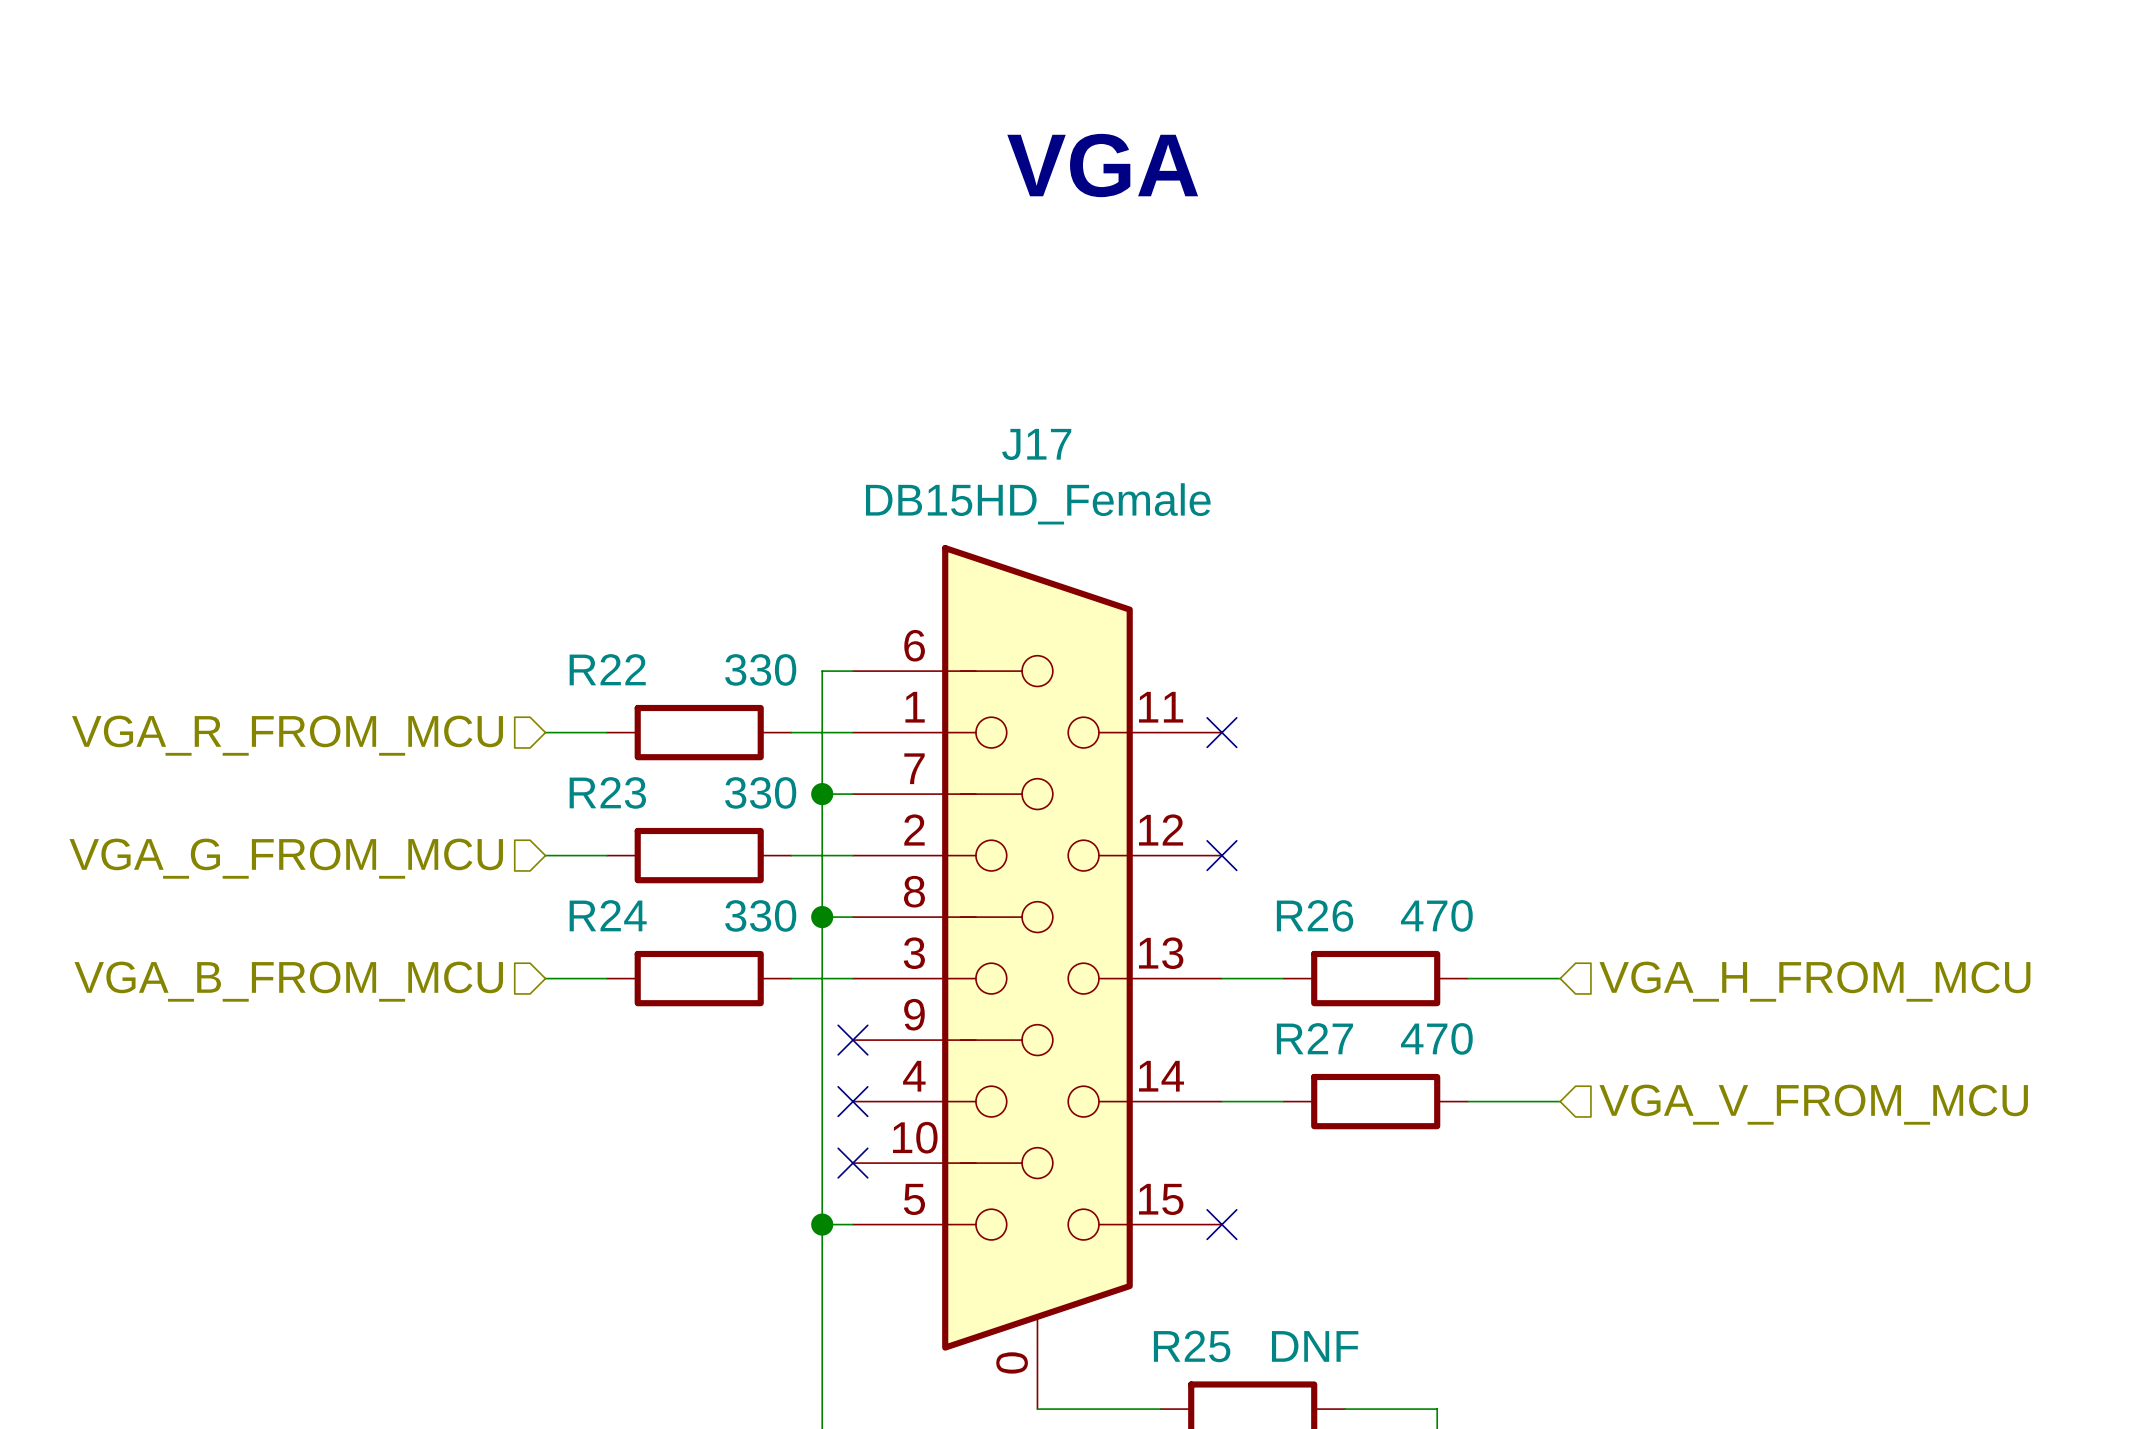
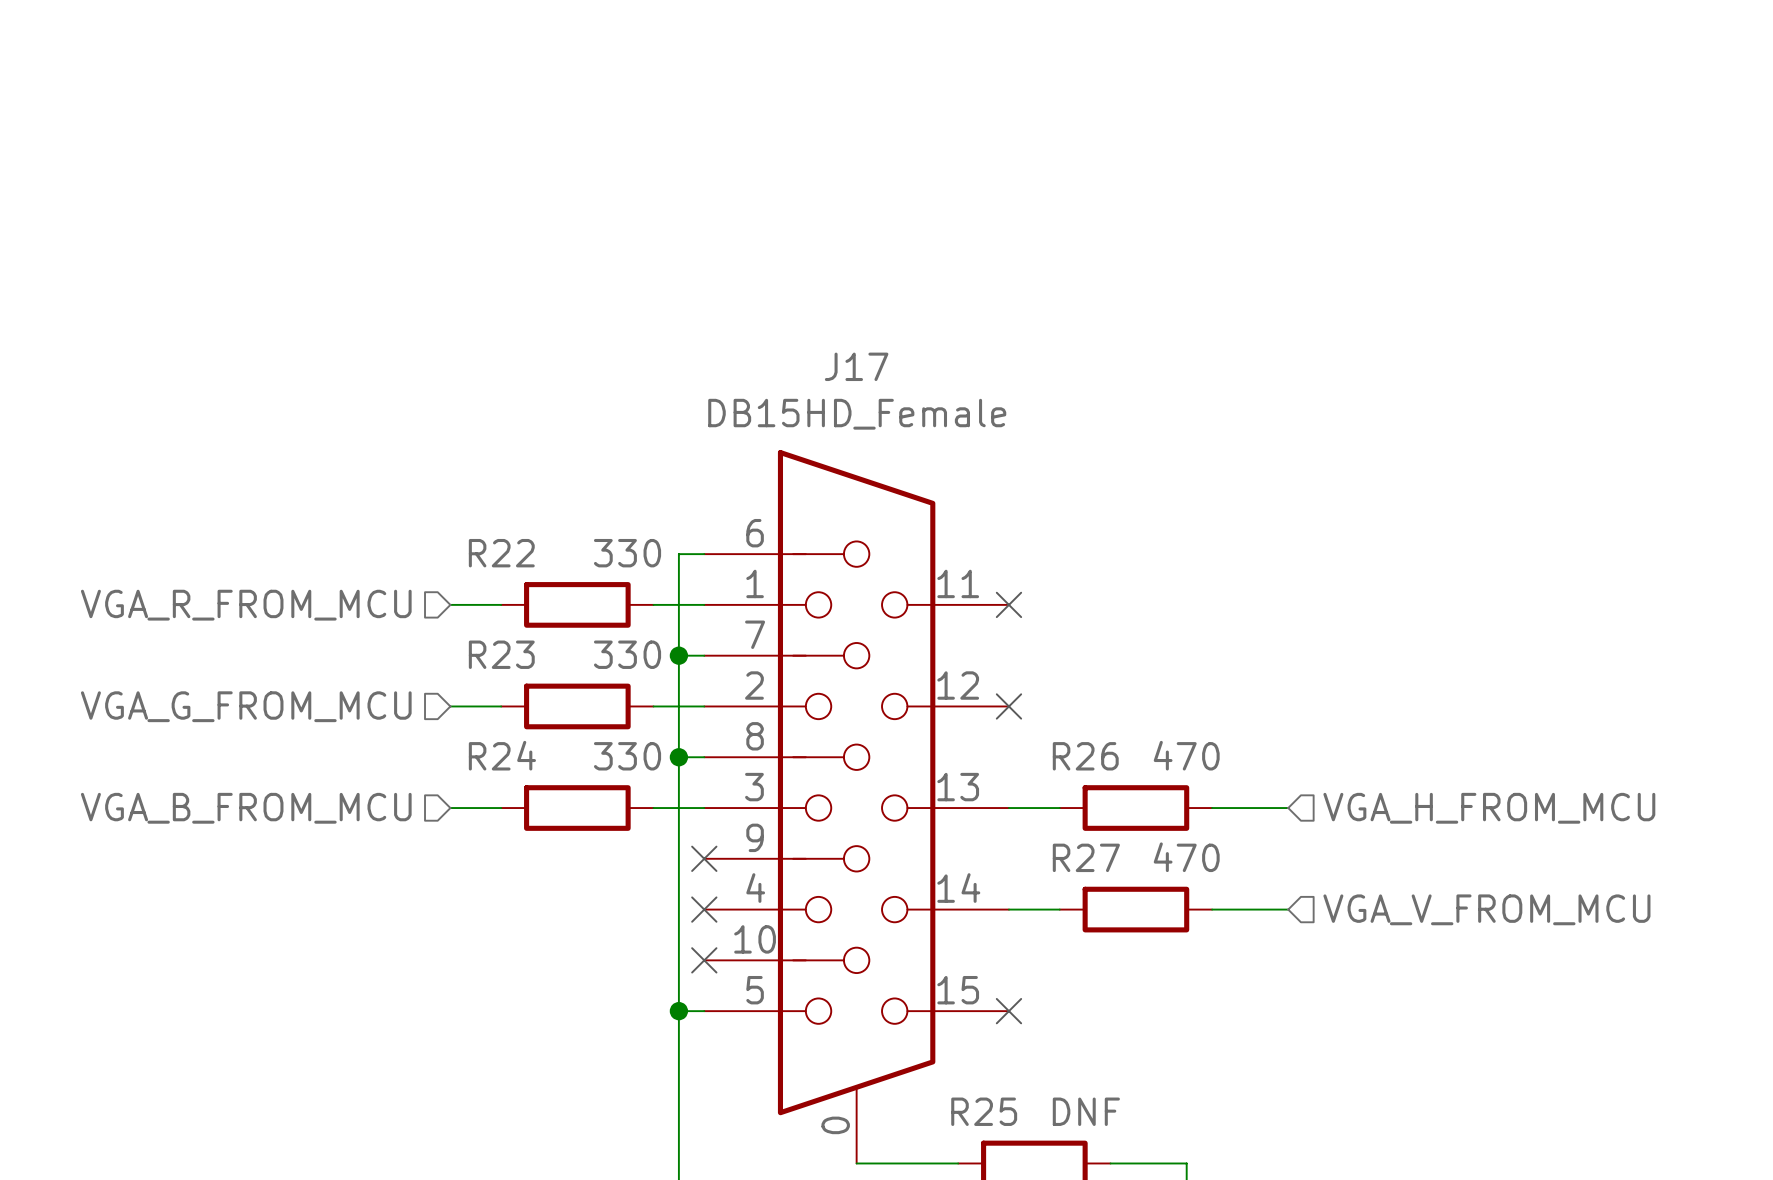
text: VGA (1102, 165) -> none

